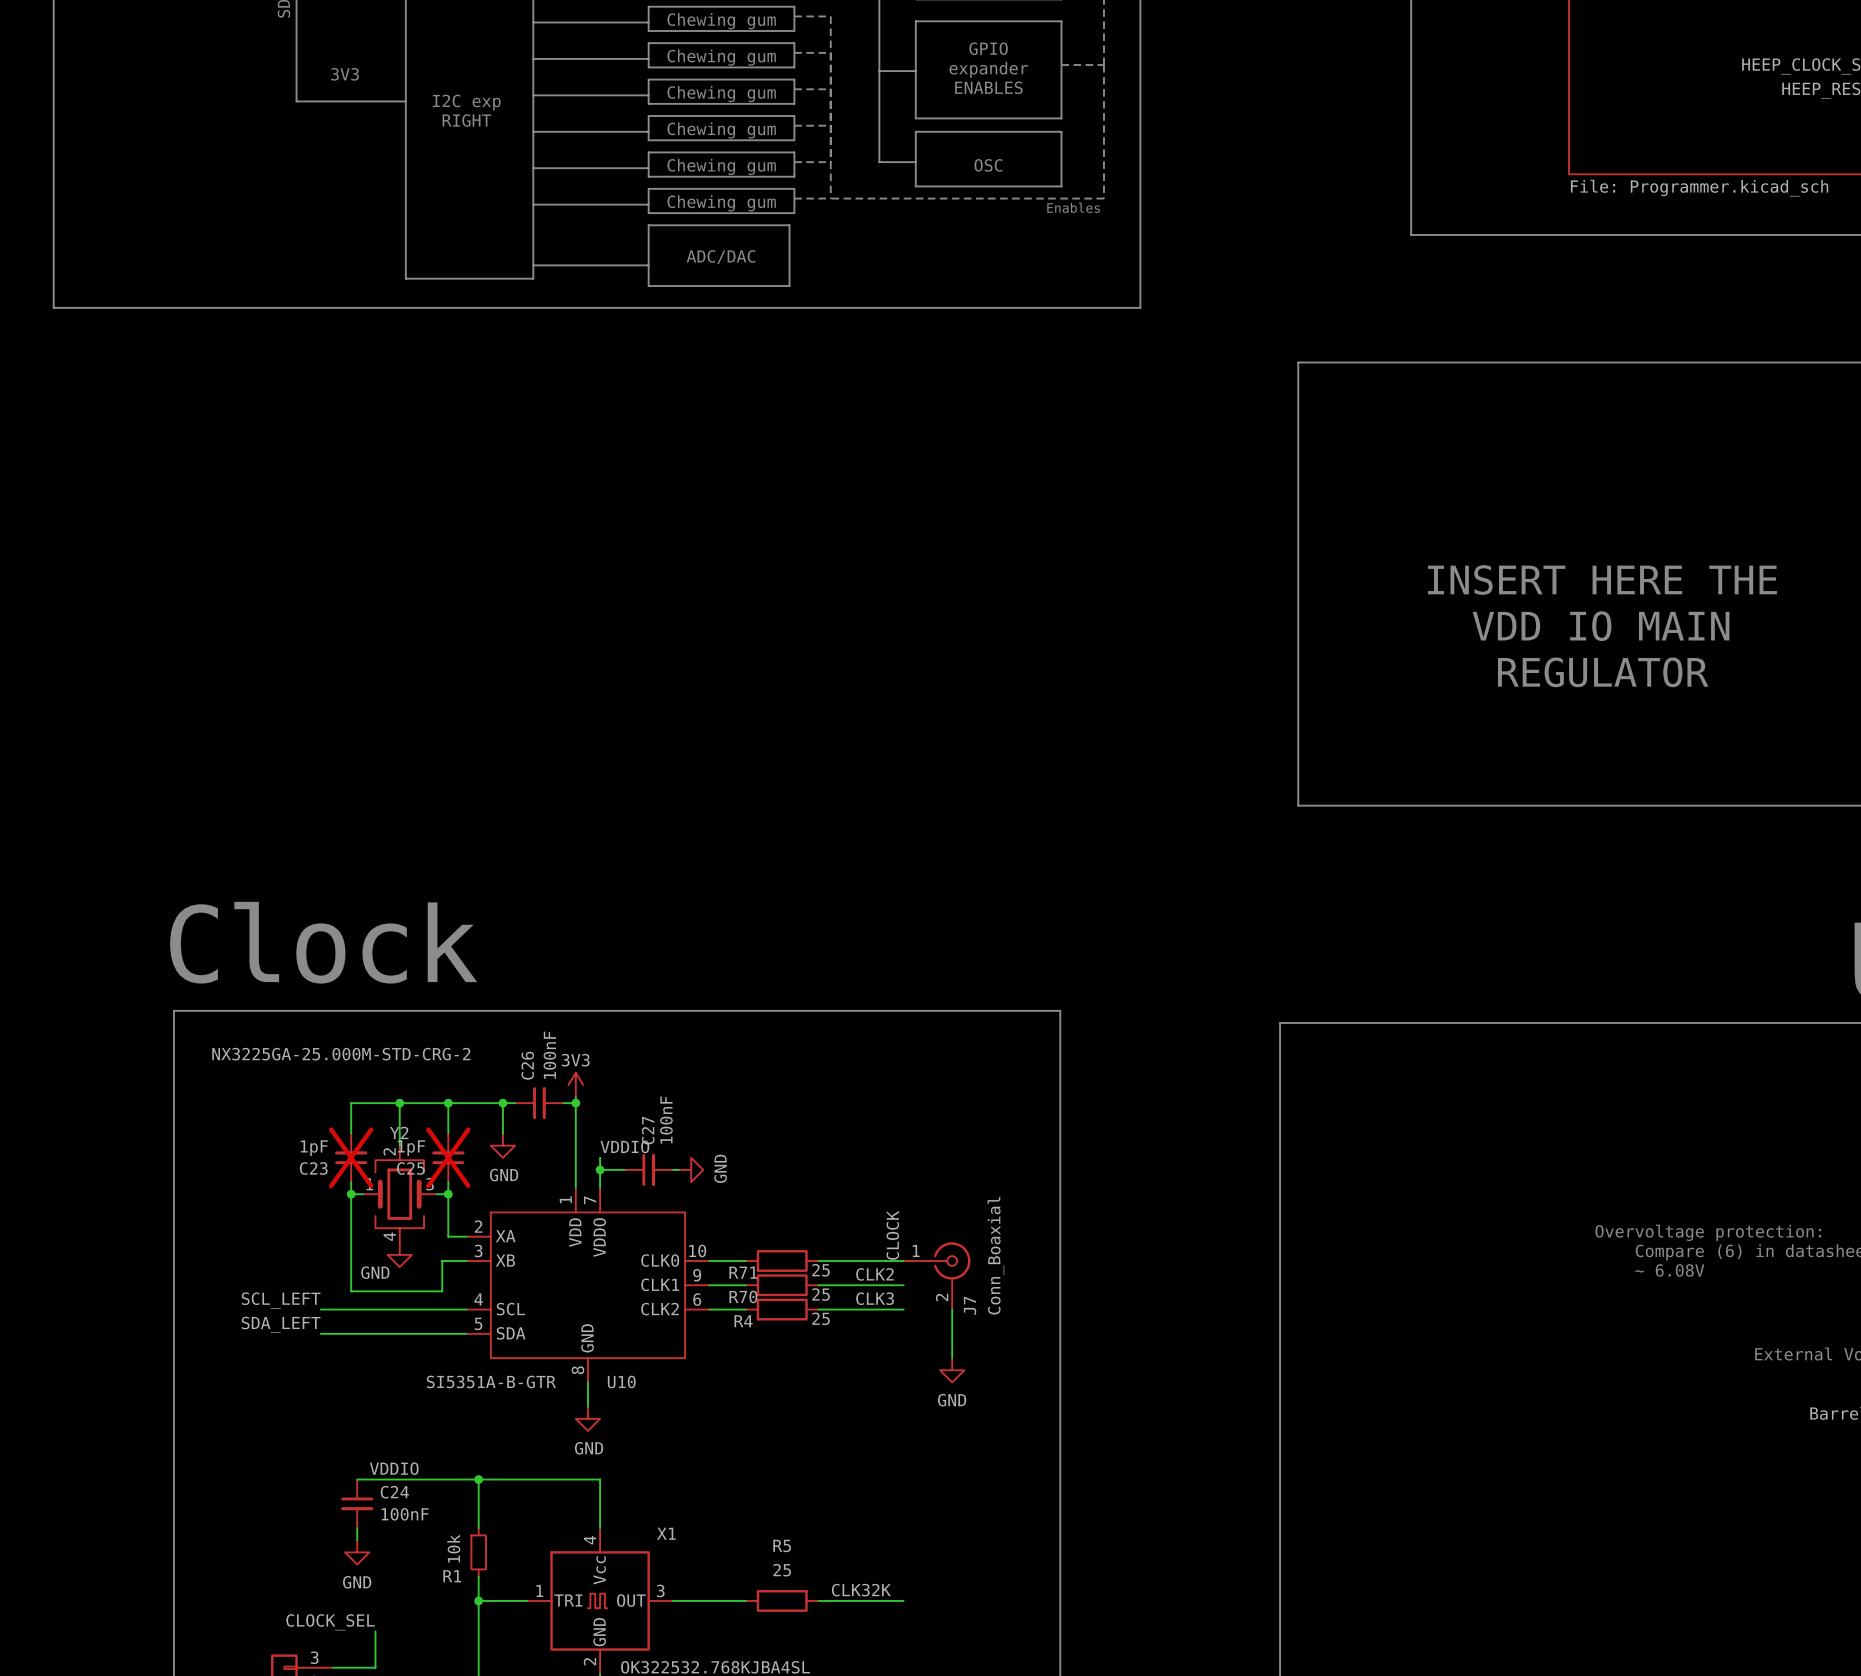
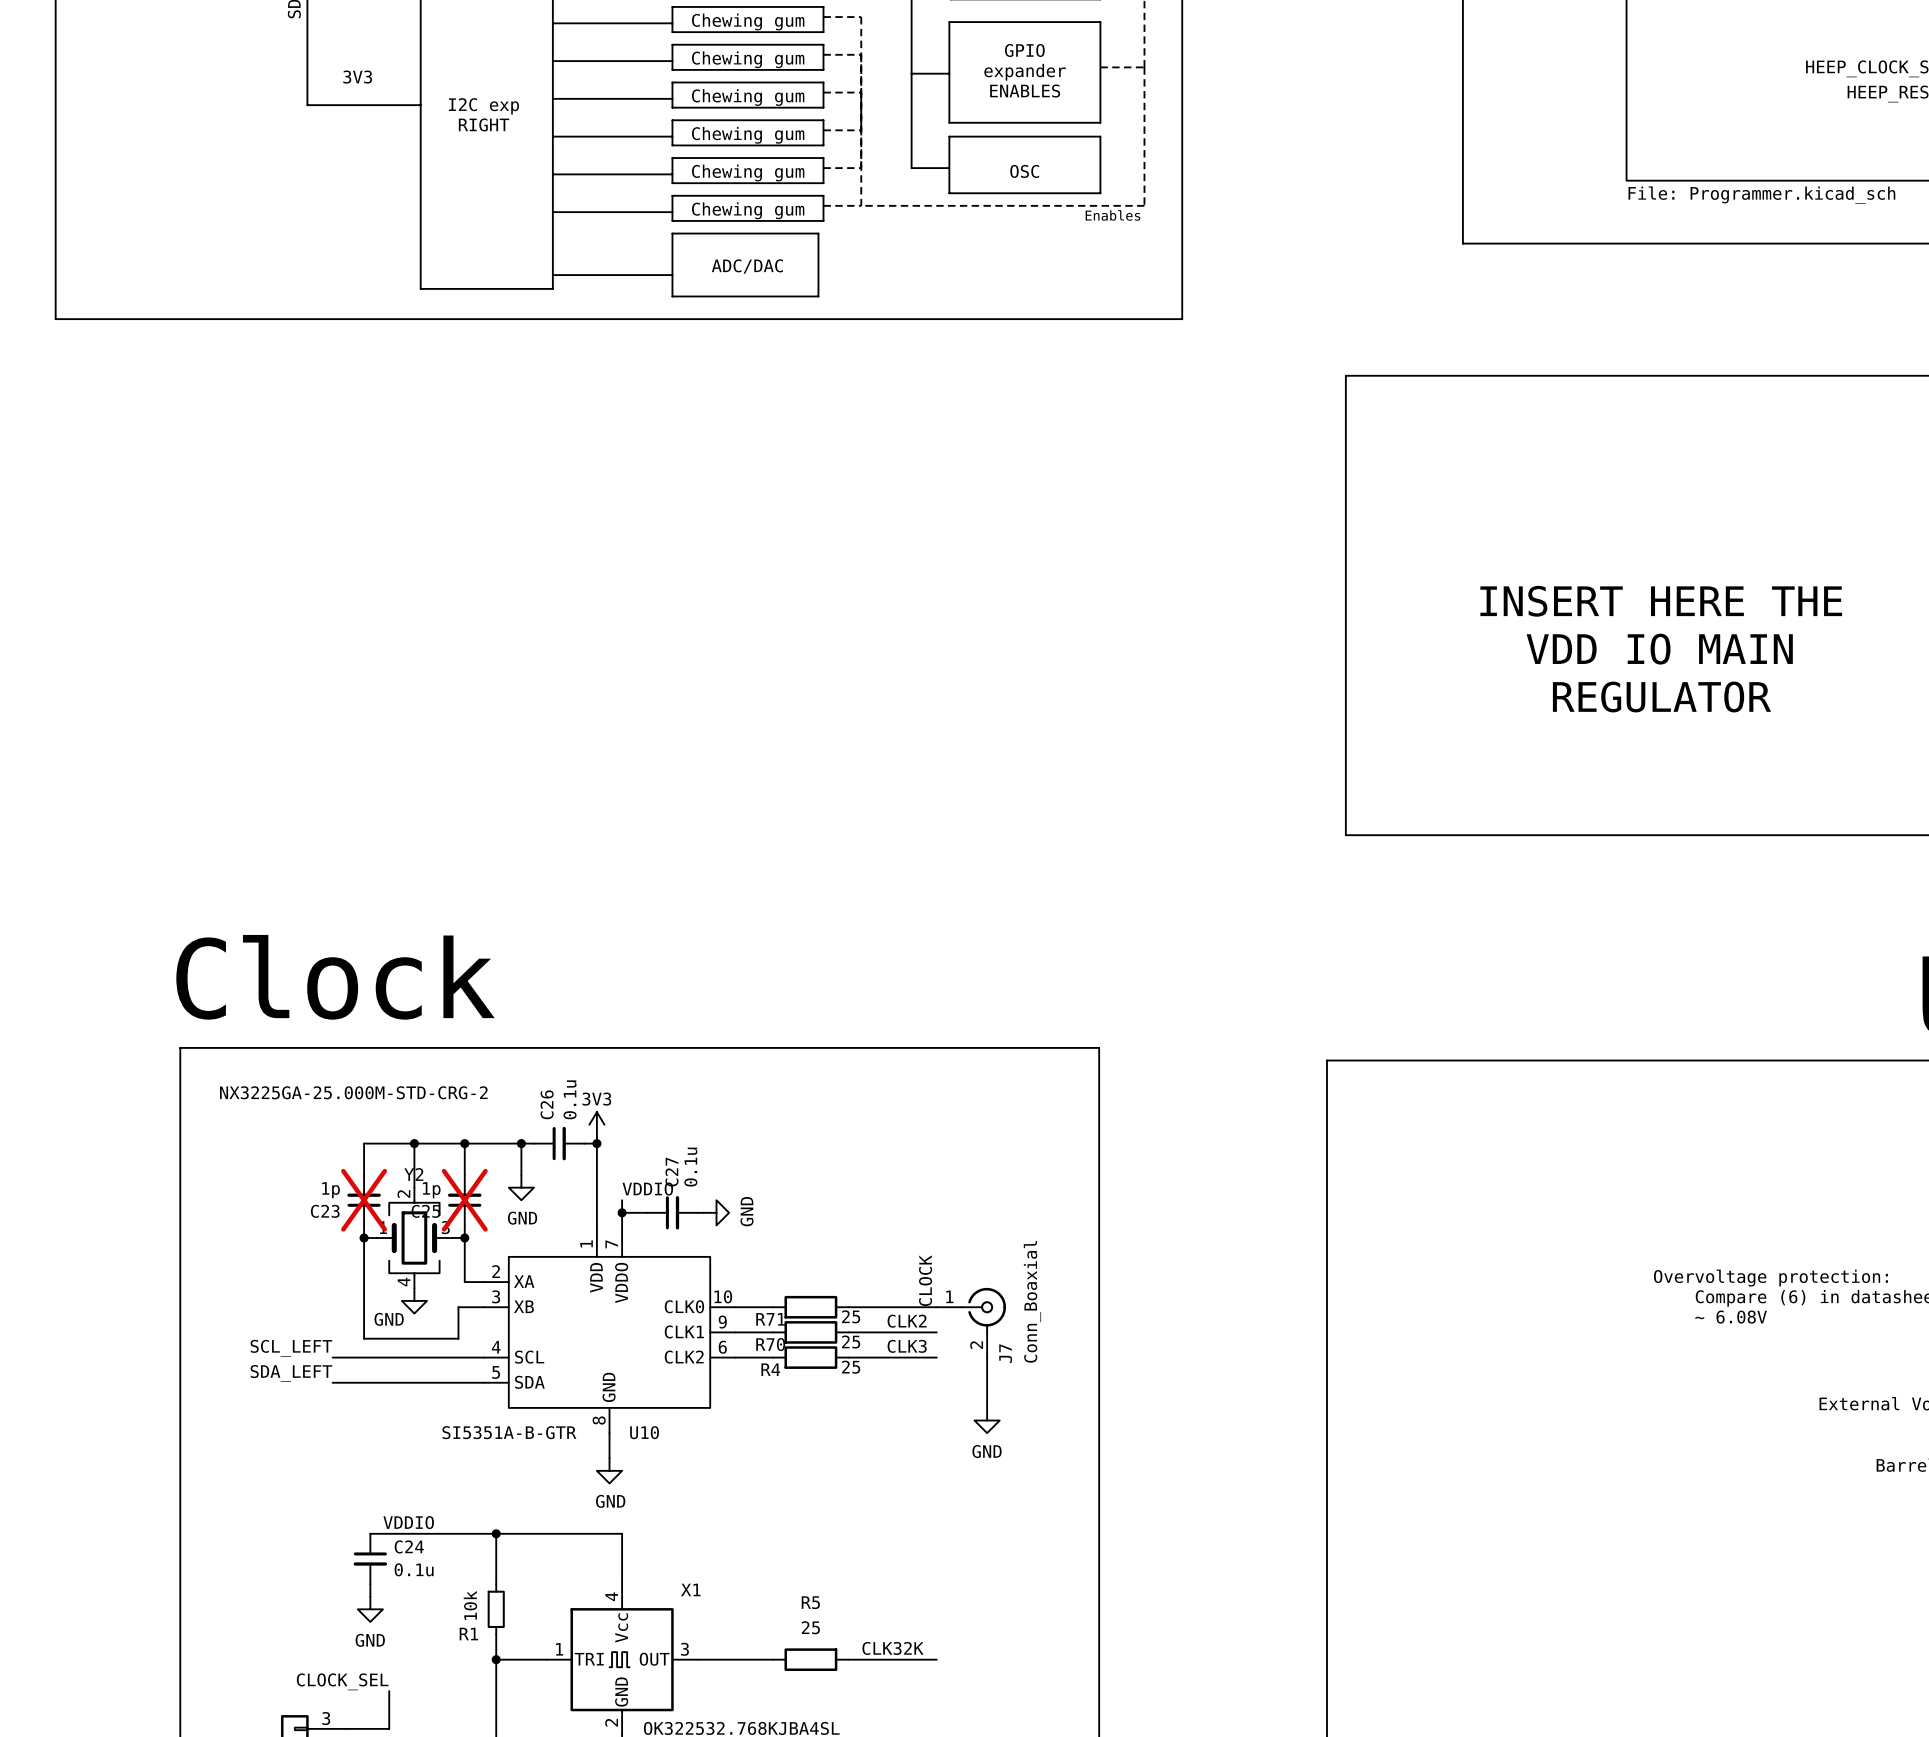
C26 value: 100nF (549, 1055) -> 0.1u (570, 1099)
C27 value: 100nF (666, 1120) -> 0.1u (690, 1167)
C23 value: 1pF (314, 1148) -> 1p (331, 1190)
C25 value: 1pF (411, 1148) -> 1p (431, 1190)
C24 value: 100nF (405, 1514) -> 0.1u (414, 1569)

